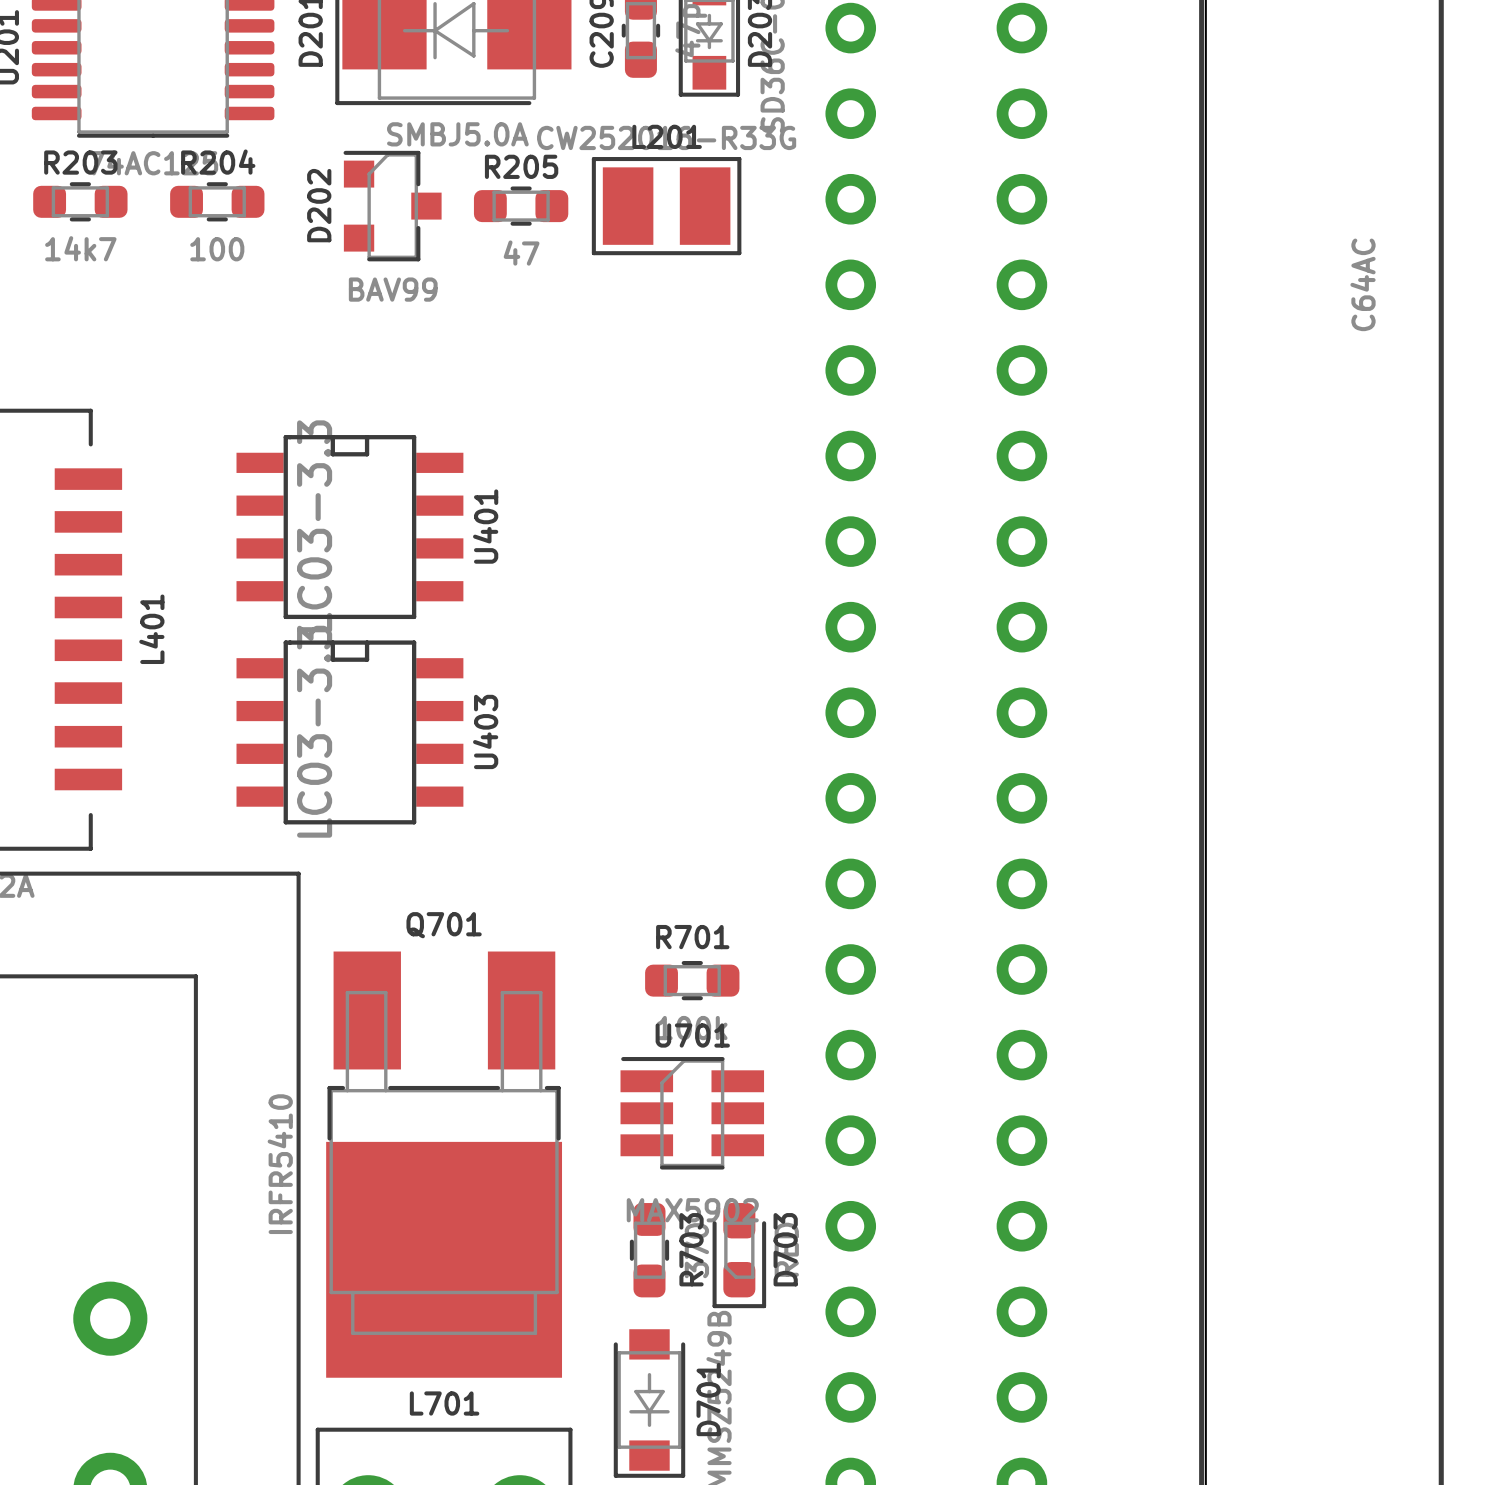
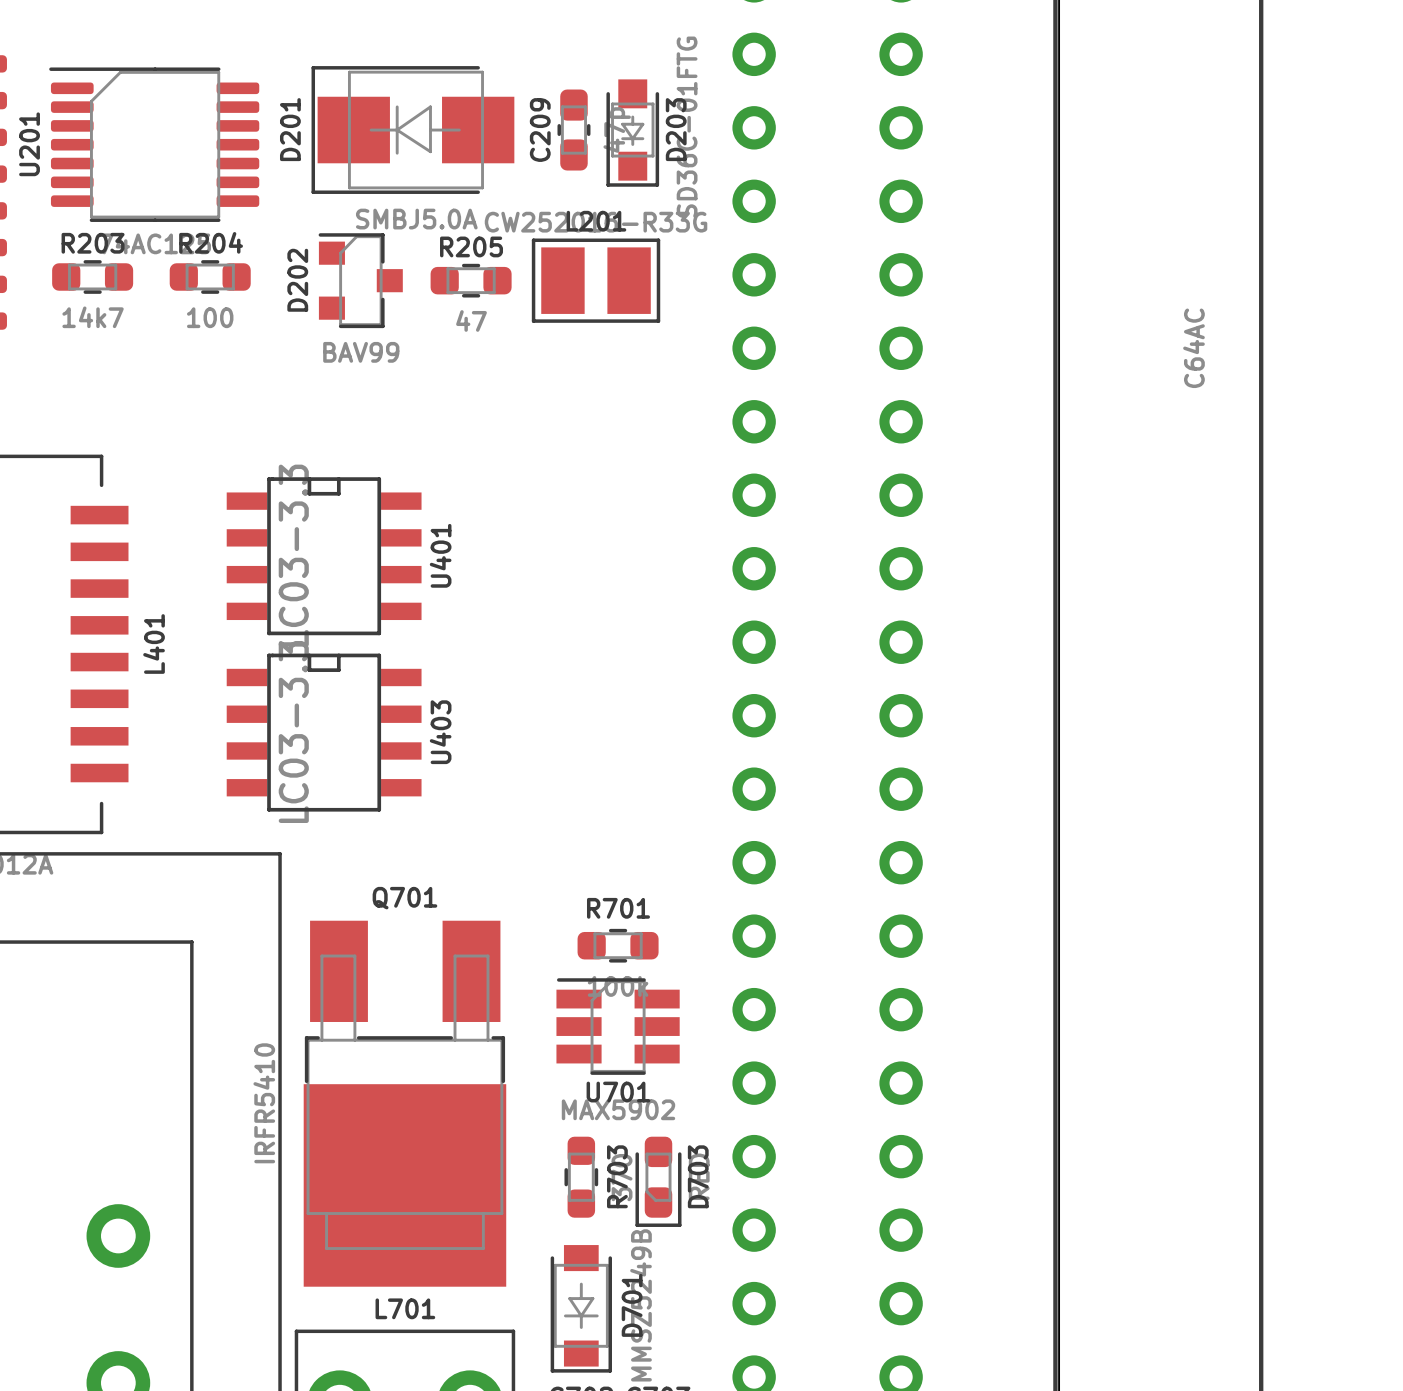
U701 name position: U701 (692, 1035) -> U701 (618, 1092)
U701 position: (692, 1113) -> (618, 1026)

